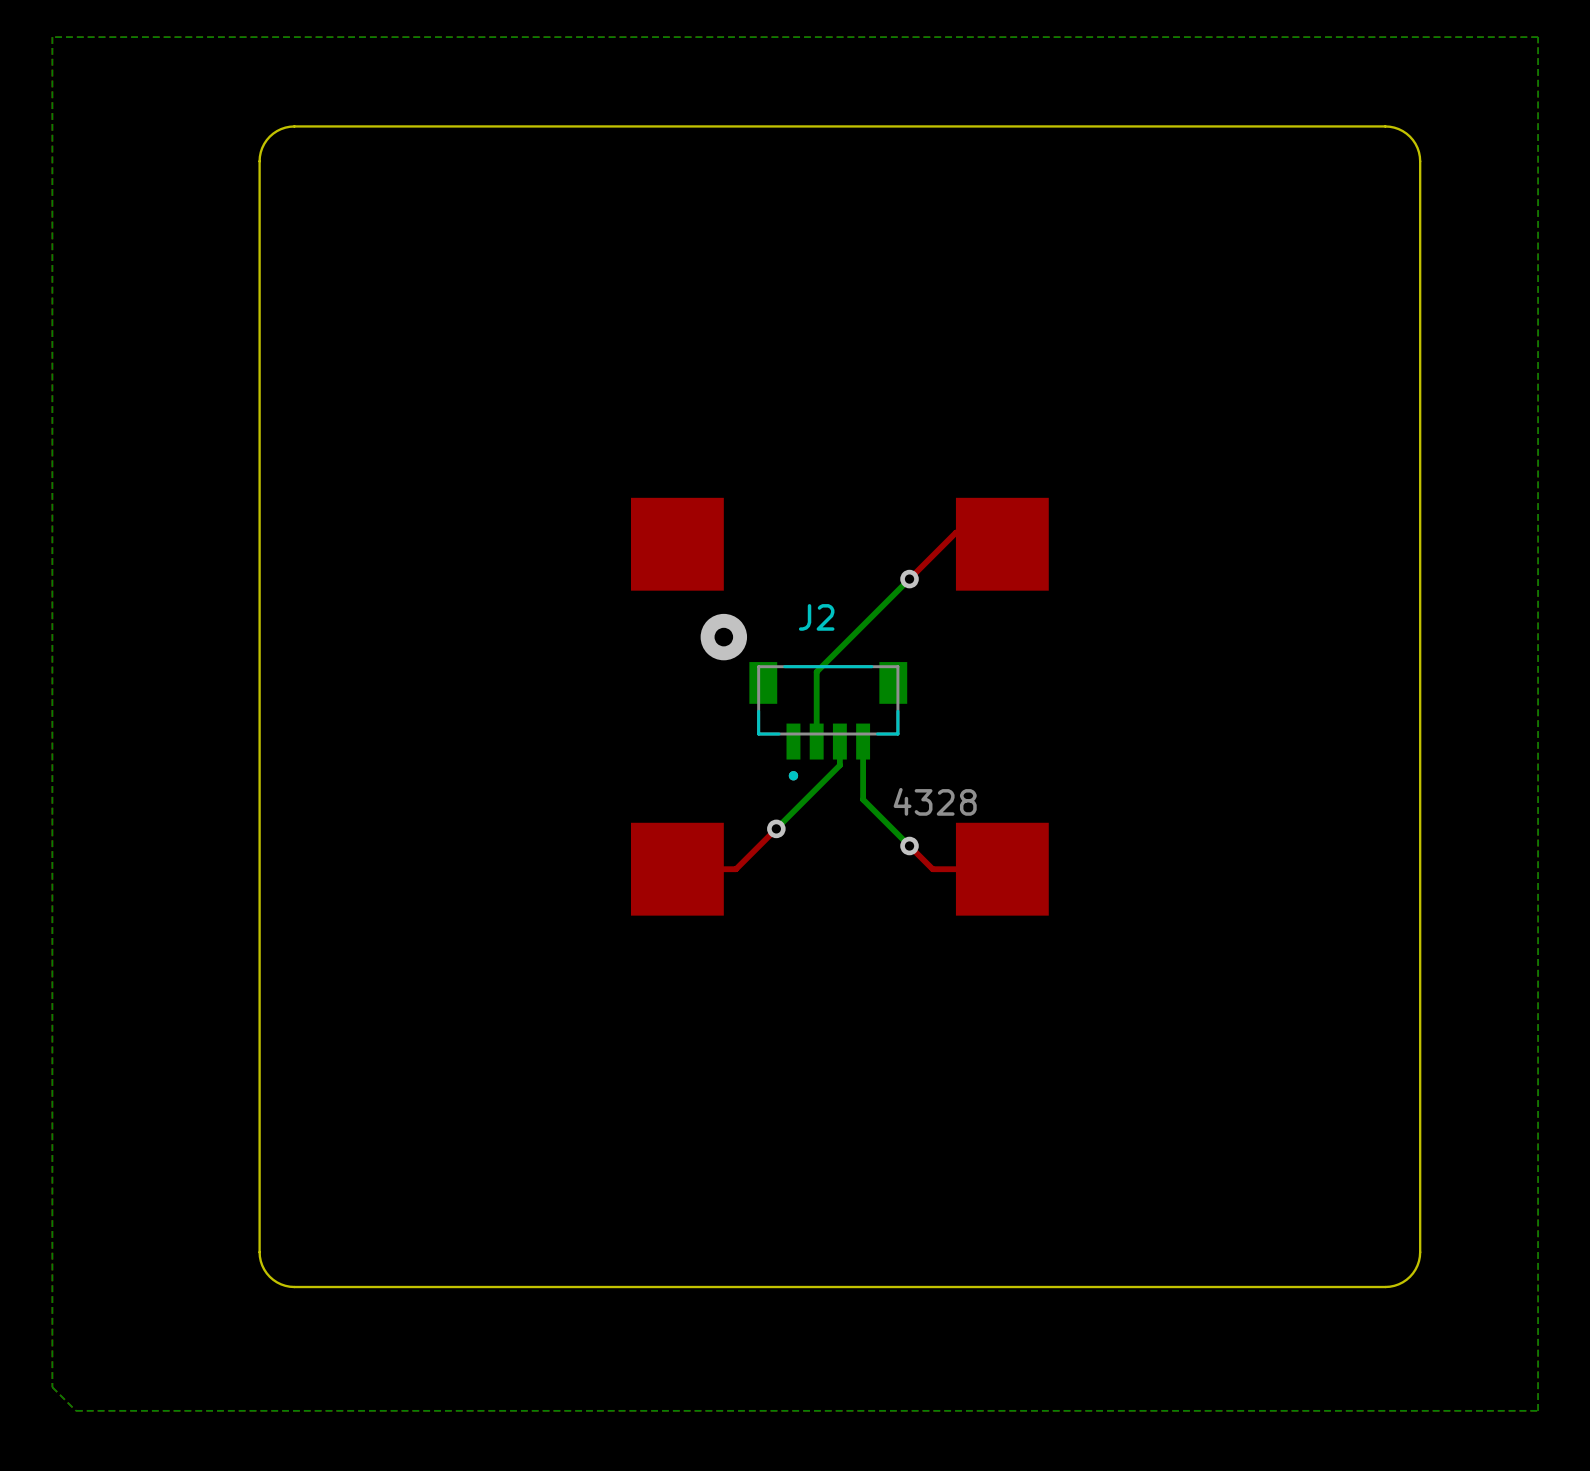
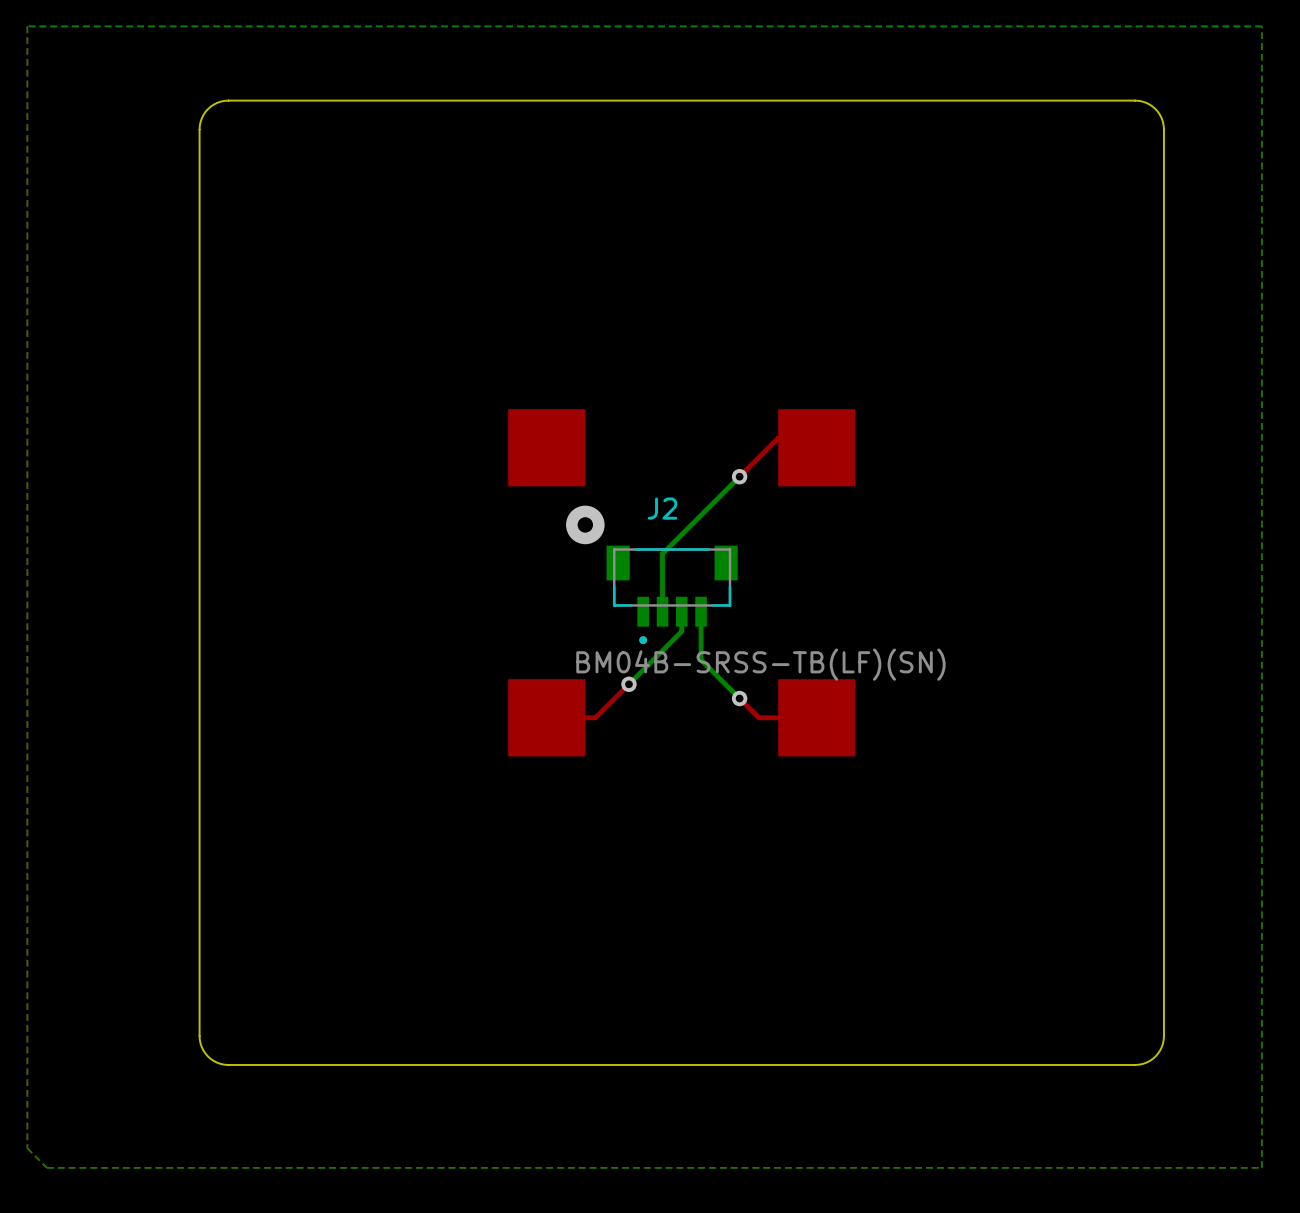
J2 value: 4328 (935, 801) -> BM04B-SRSS-TB(LF)(SN) (760, 664)

